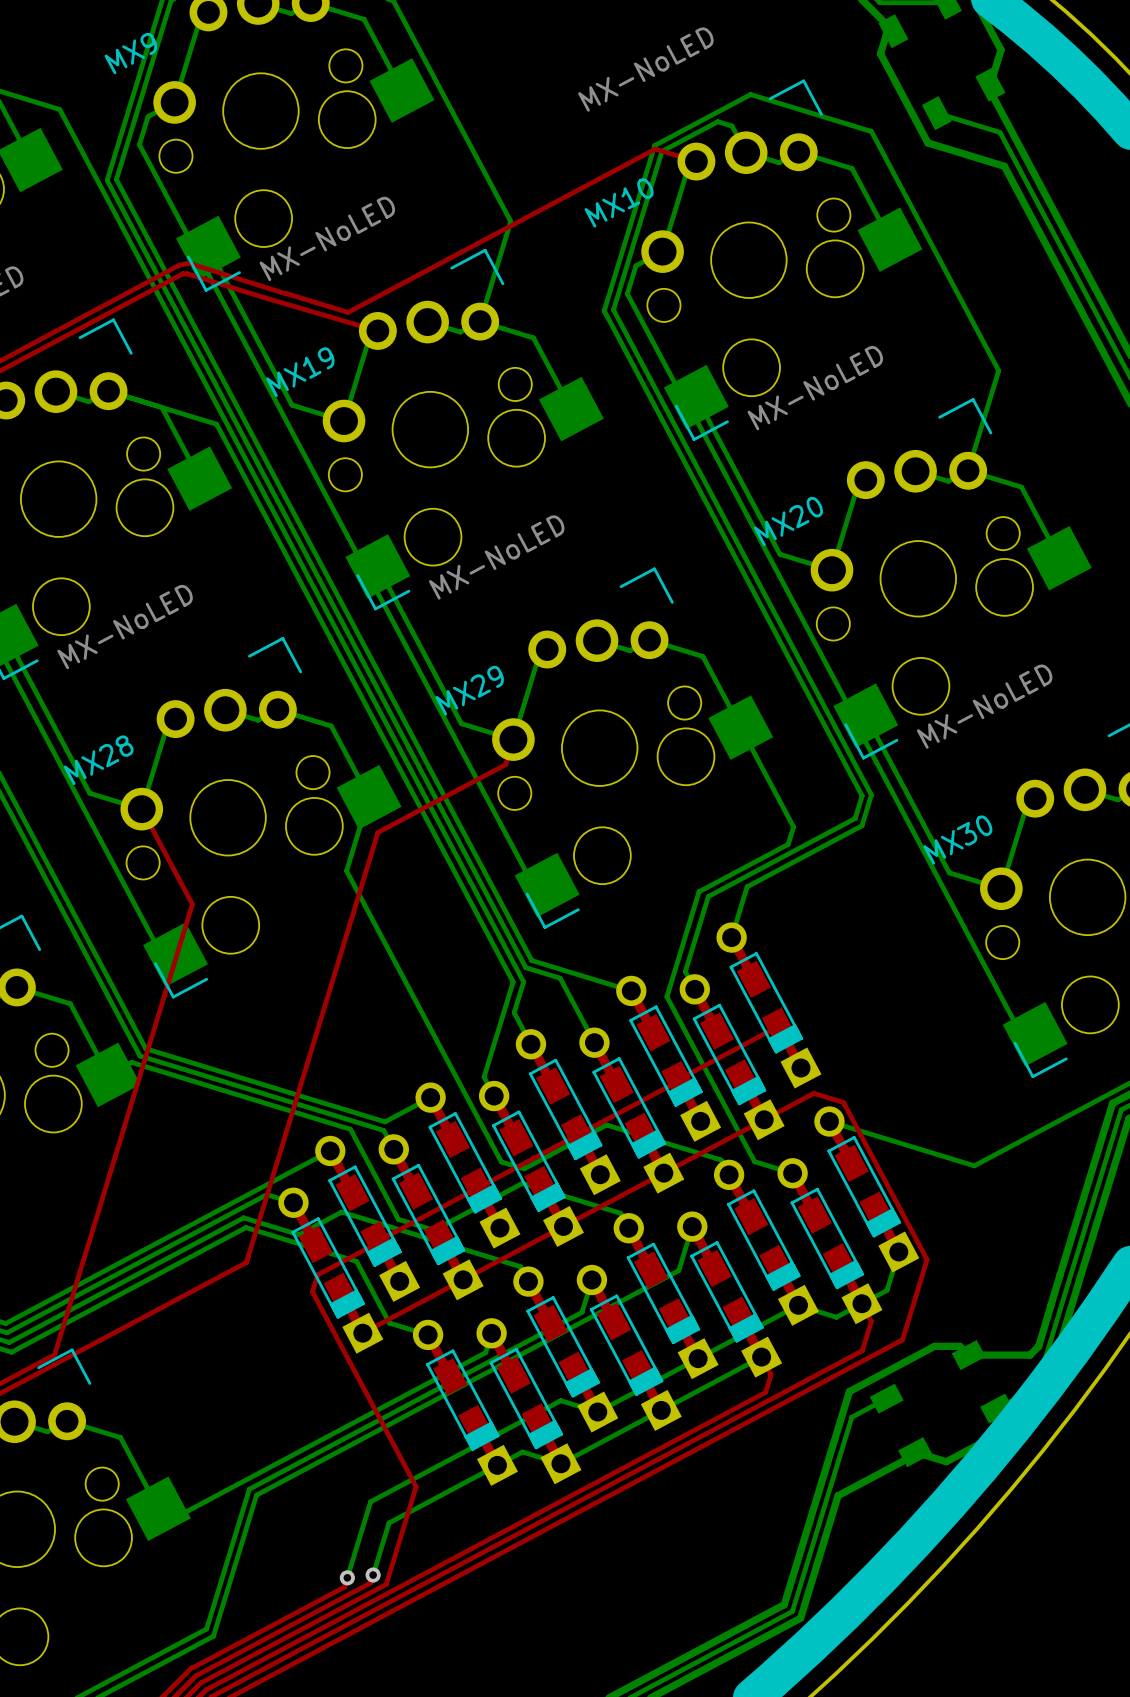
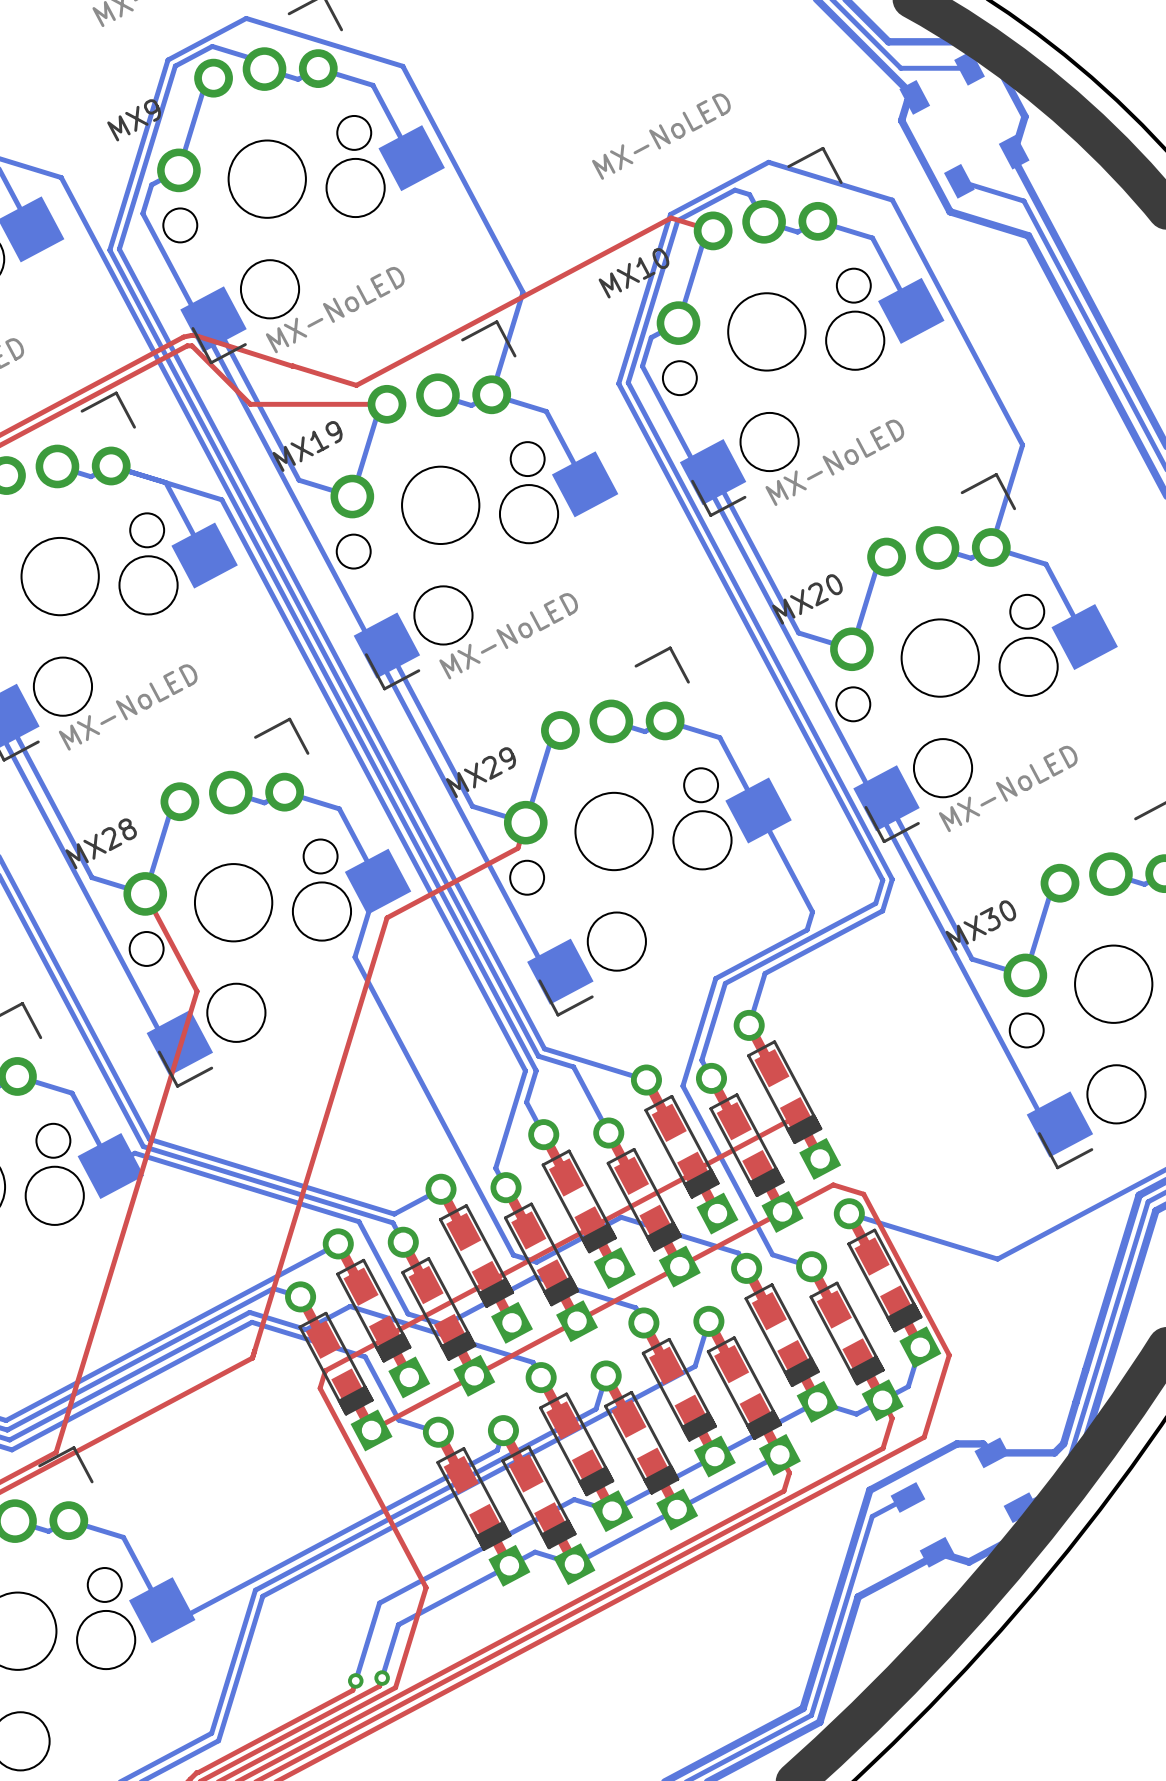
top track: (187, 273) (377, 330) -> (192, 345) (250, 404) (386, 404)

